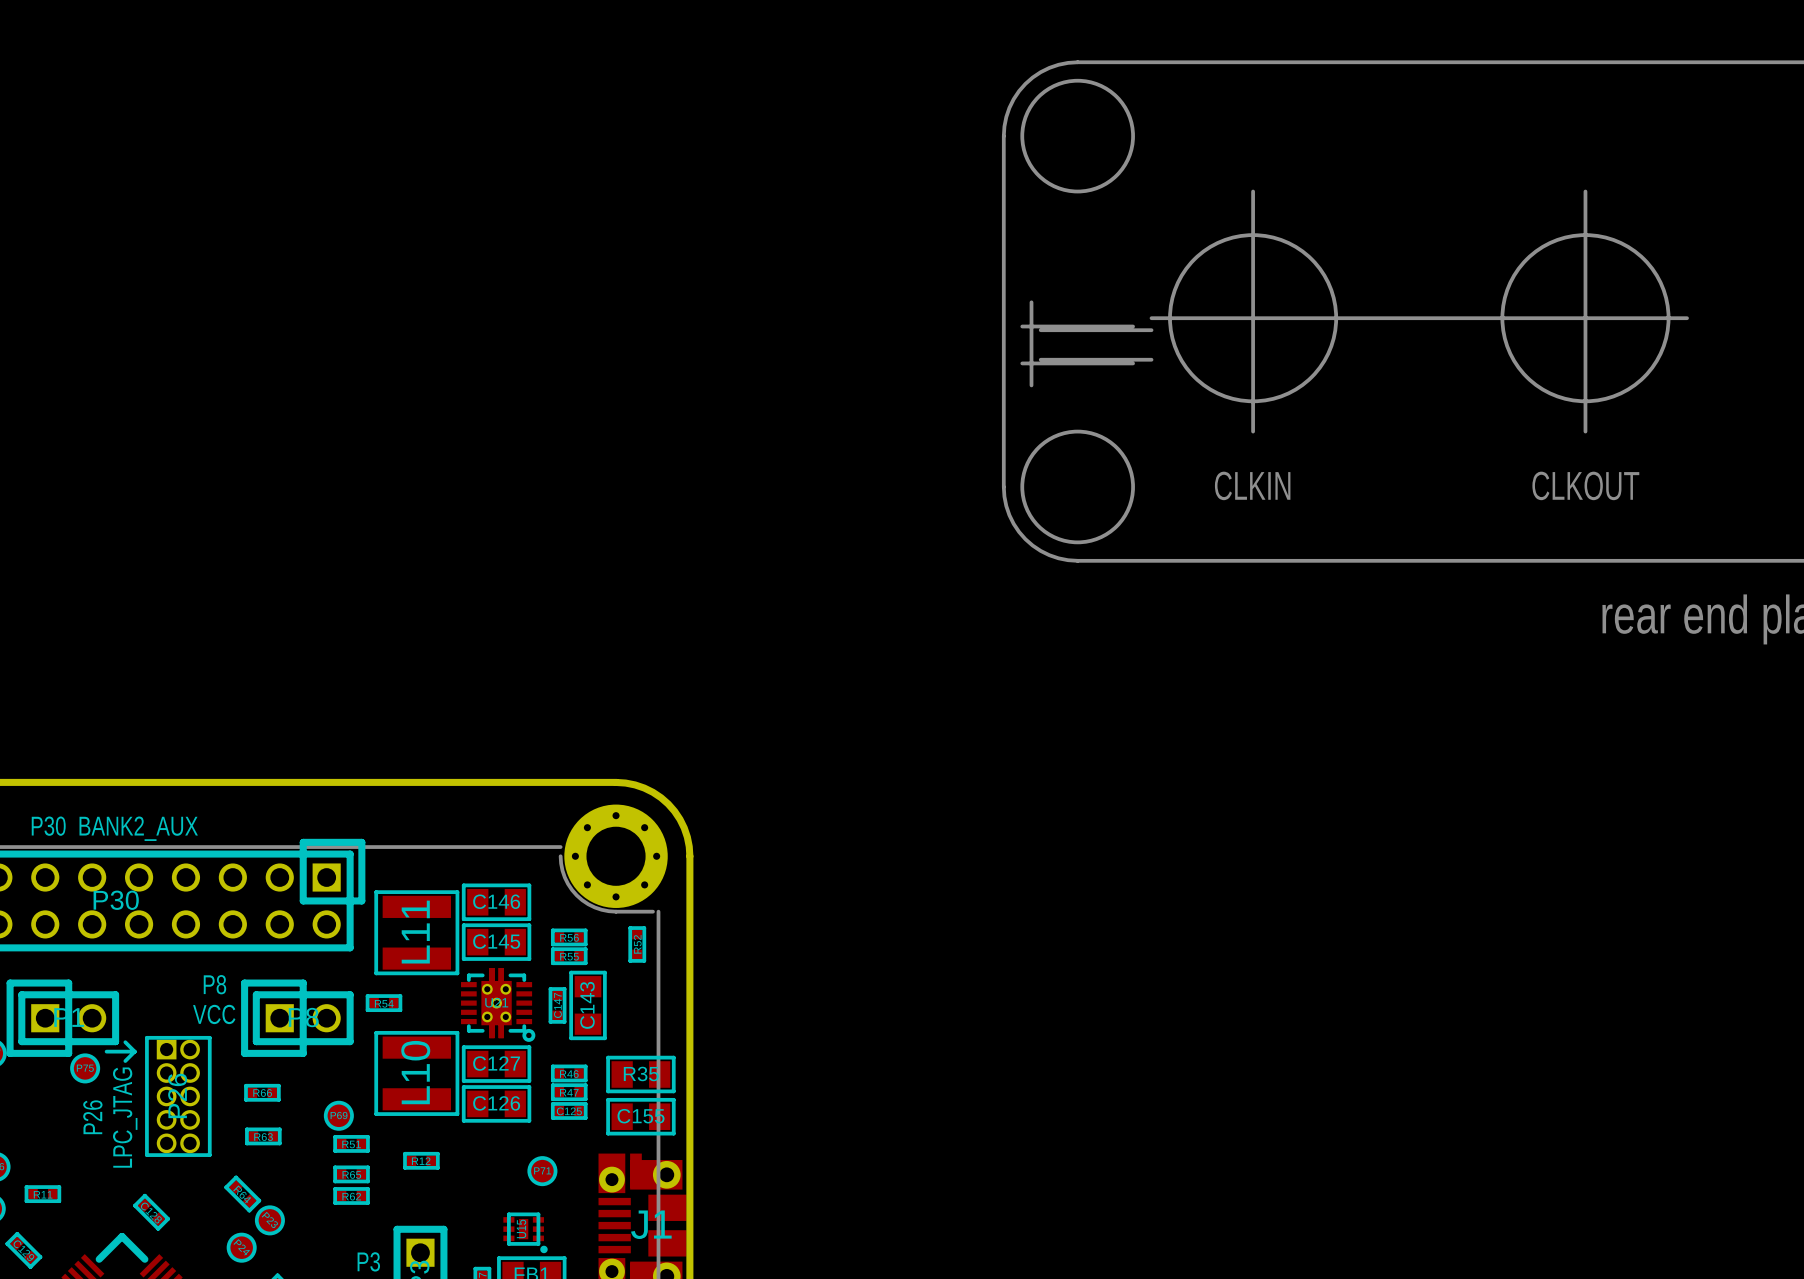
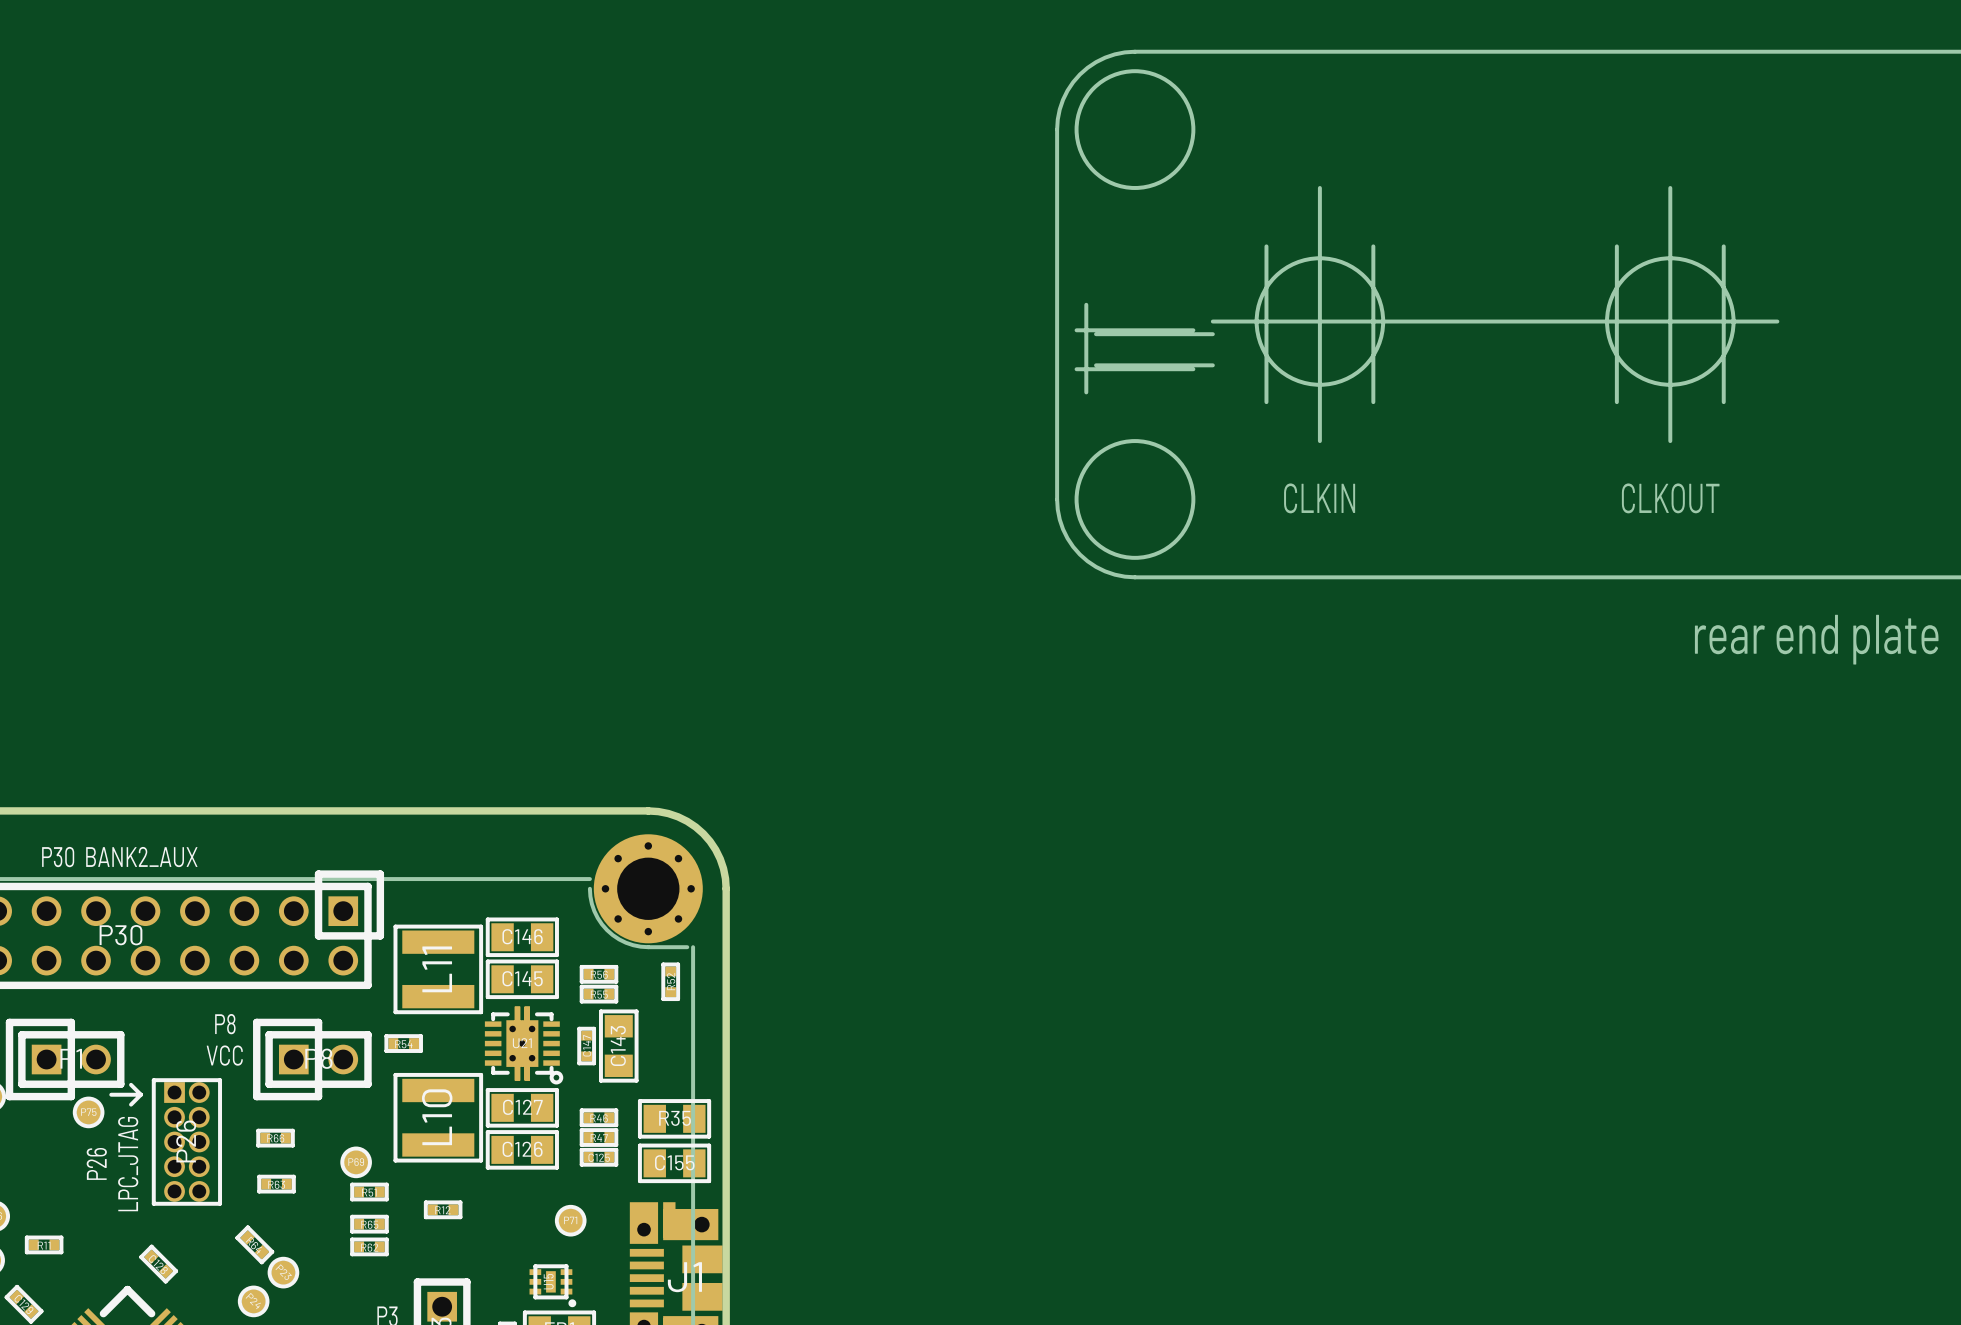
drawing shape: [1168, 233, 1339, 404] -> [1254, 256, 1386, 387]
drawing shape: [1500, 233, 1671, 404] -> [1605, 256, 1736, 387]
line: none -> (1266, 246) (1266, 402)
line: none -> (1373, 246) (1373, 402)
line: none -> (1616, 246) (1616, 402)
line: none -> (1723, 246) (1723, 402)

